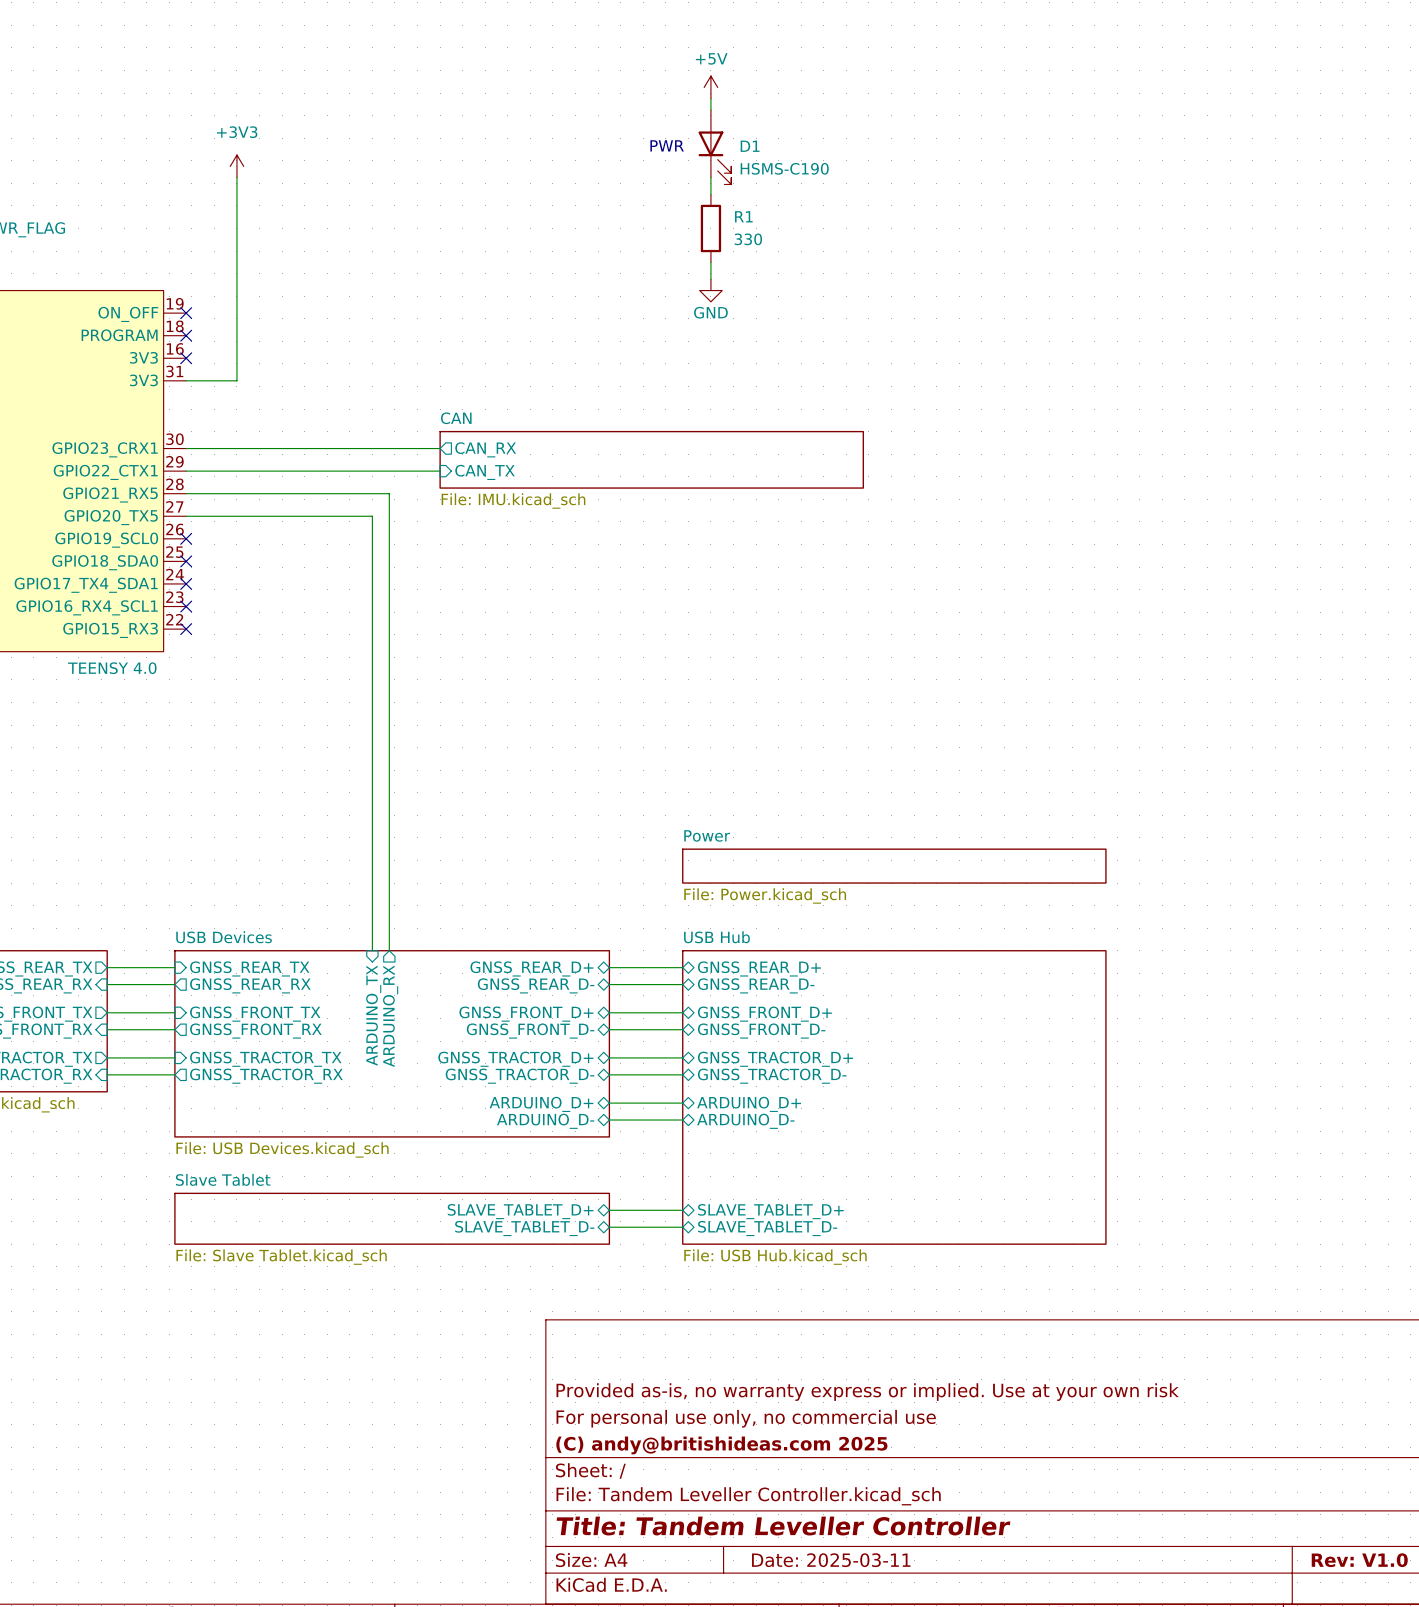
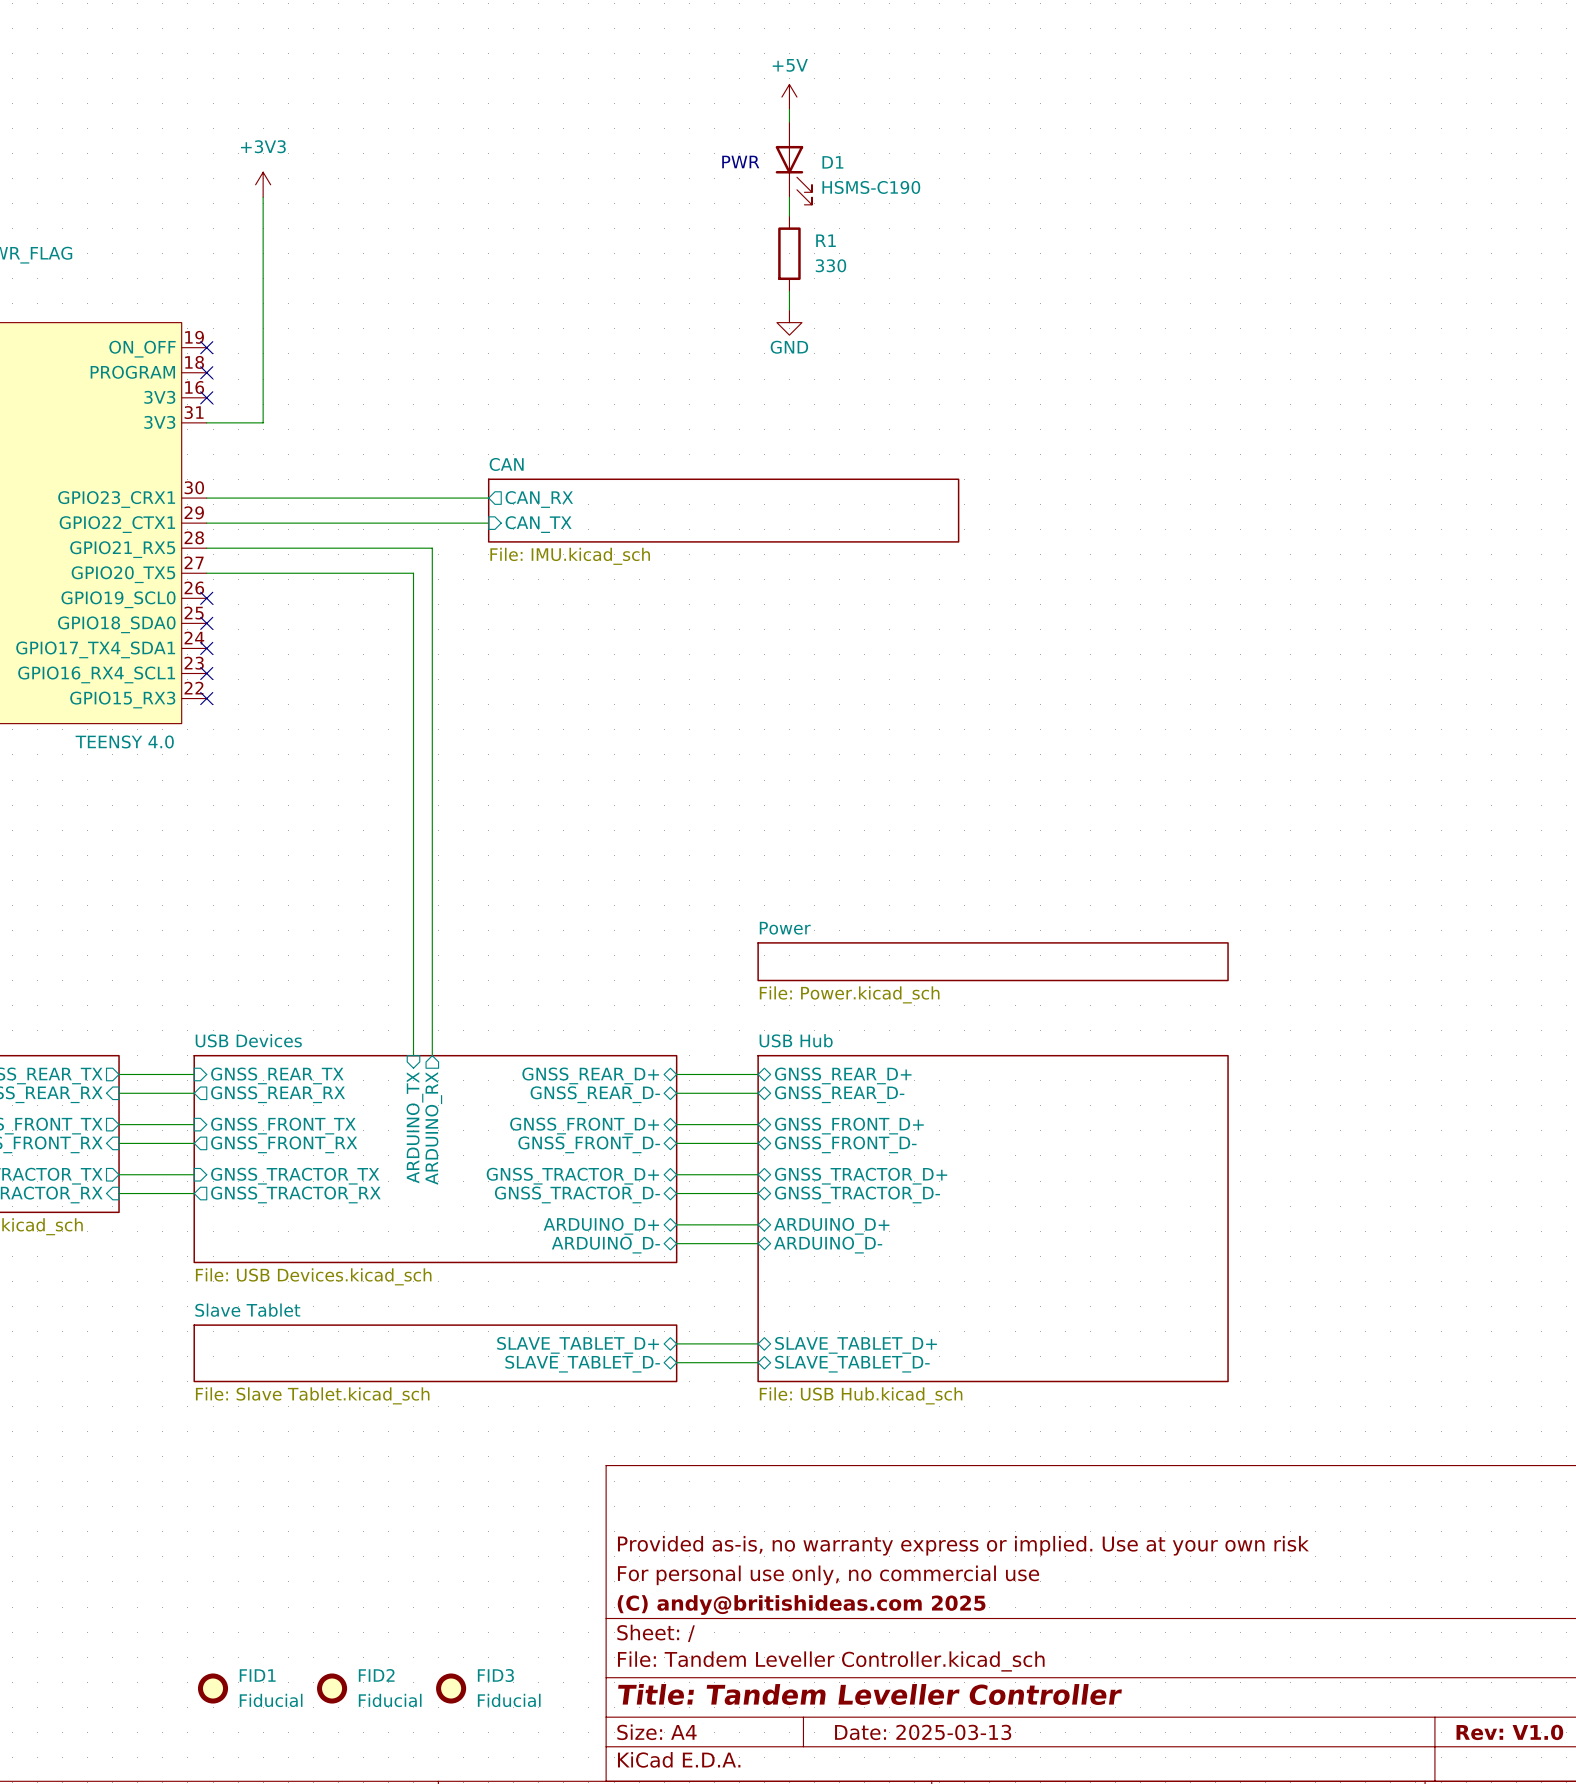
FID1: none -> Fiducial (213, 1688)
FID2: none -> Fiducial (332, 1688)
FID3: none -> Fiducial (451, 1688)
title block: Date: 2025-03-11 (831, 1560) -> Date: 2025-03-13 (923, 1732)

